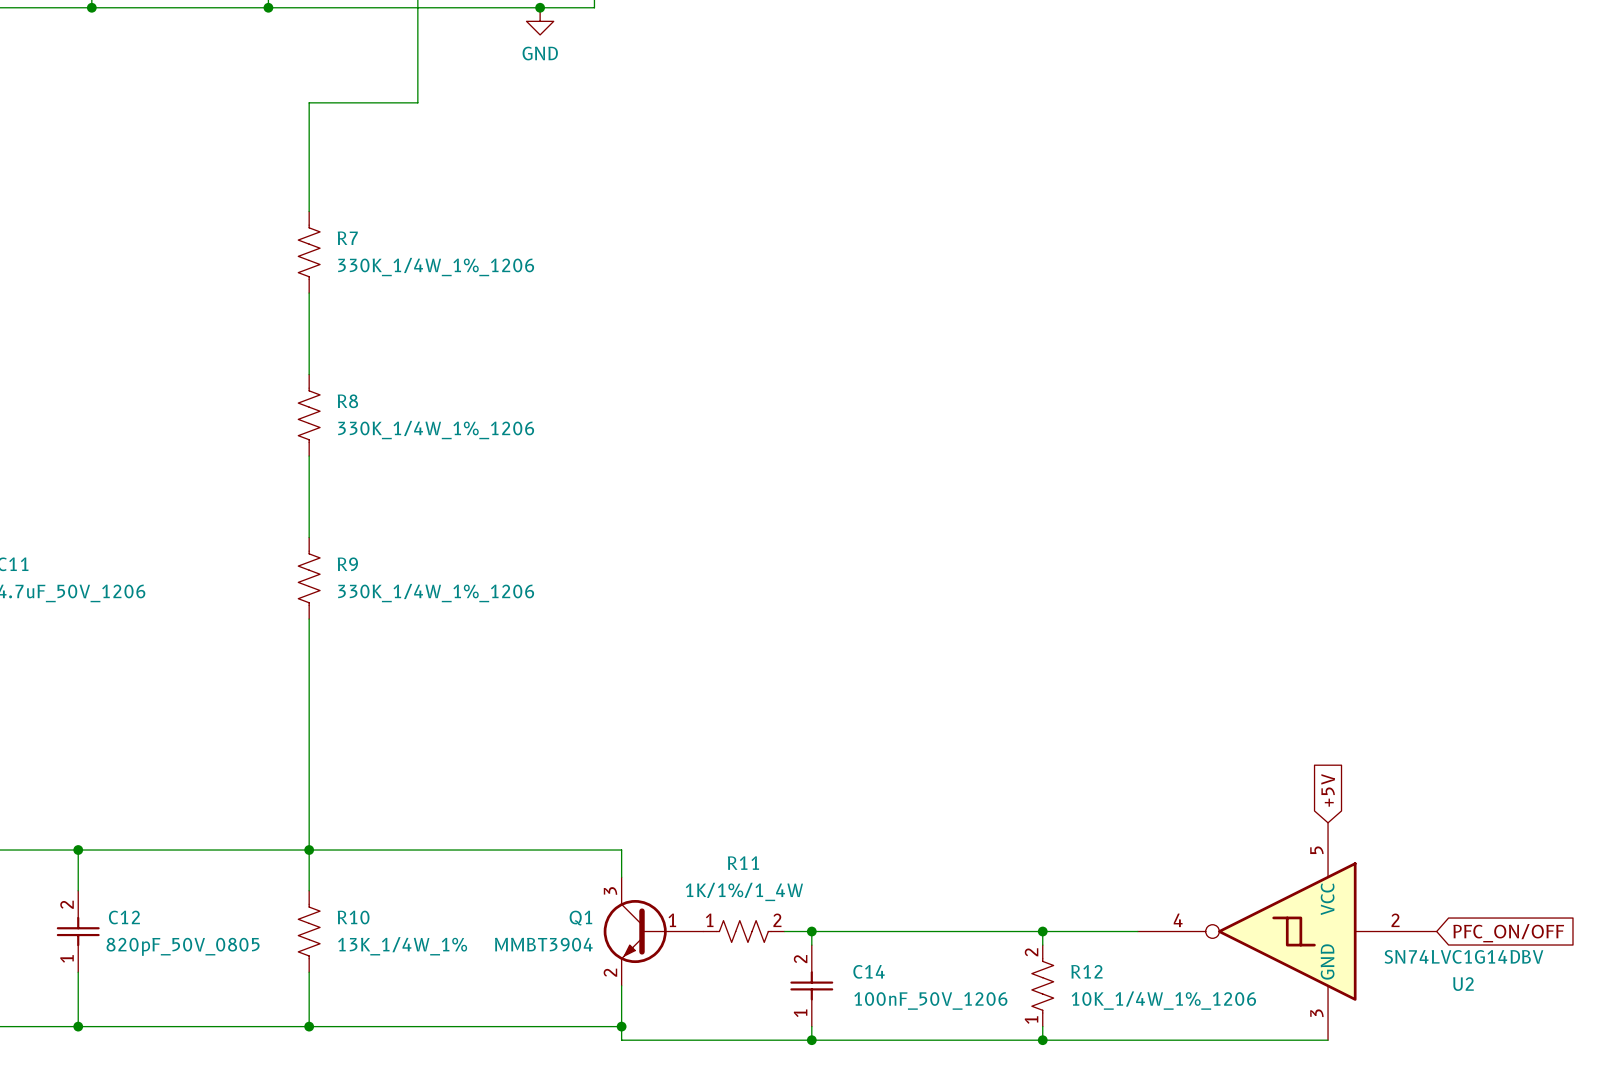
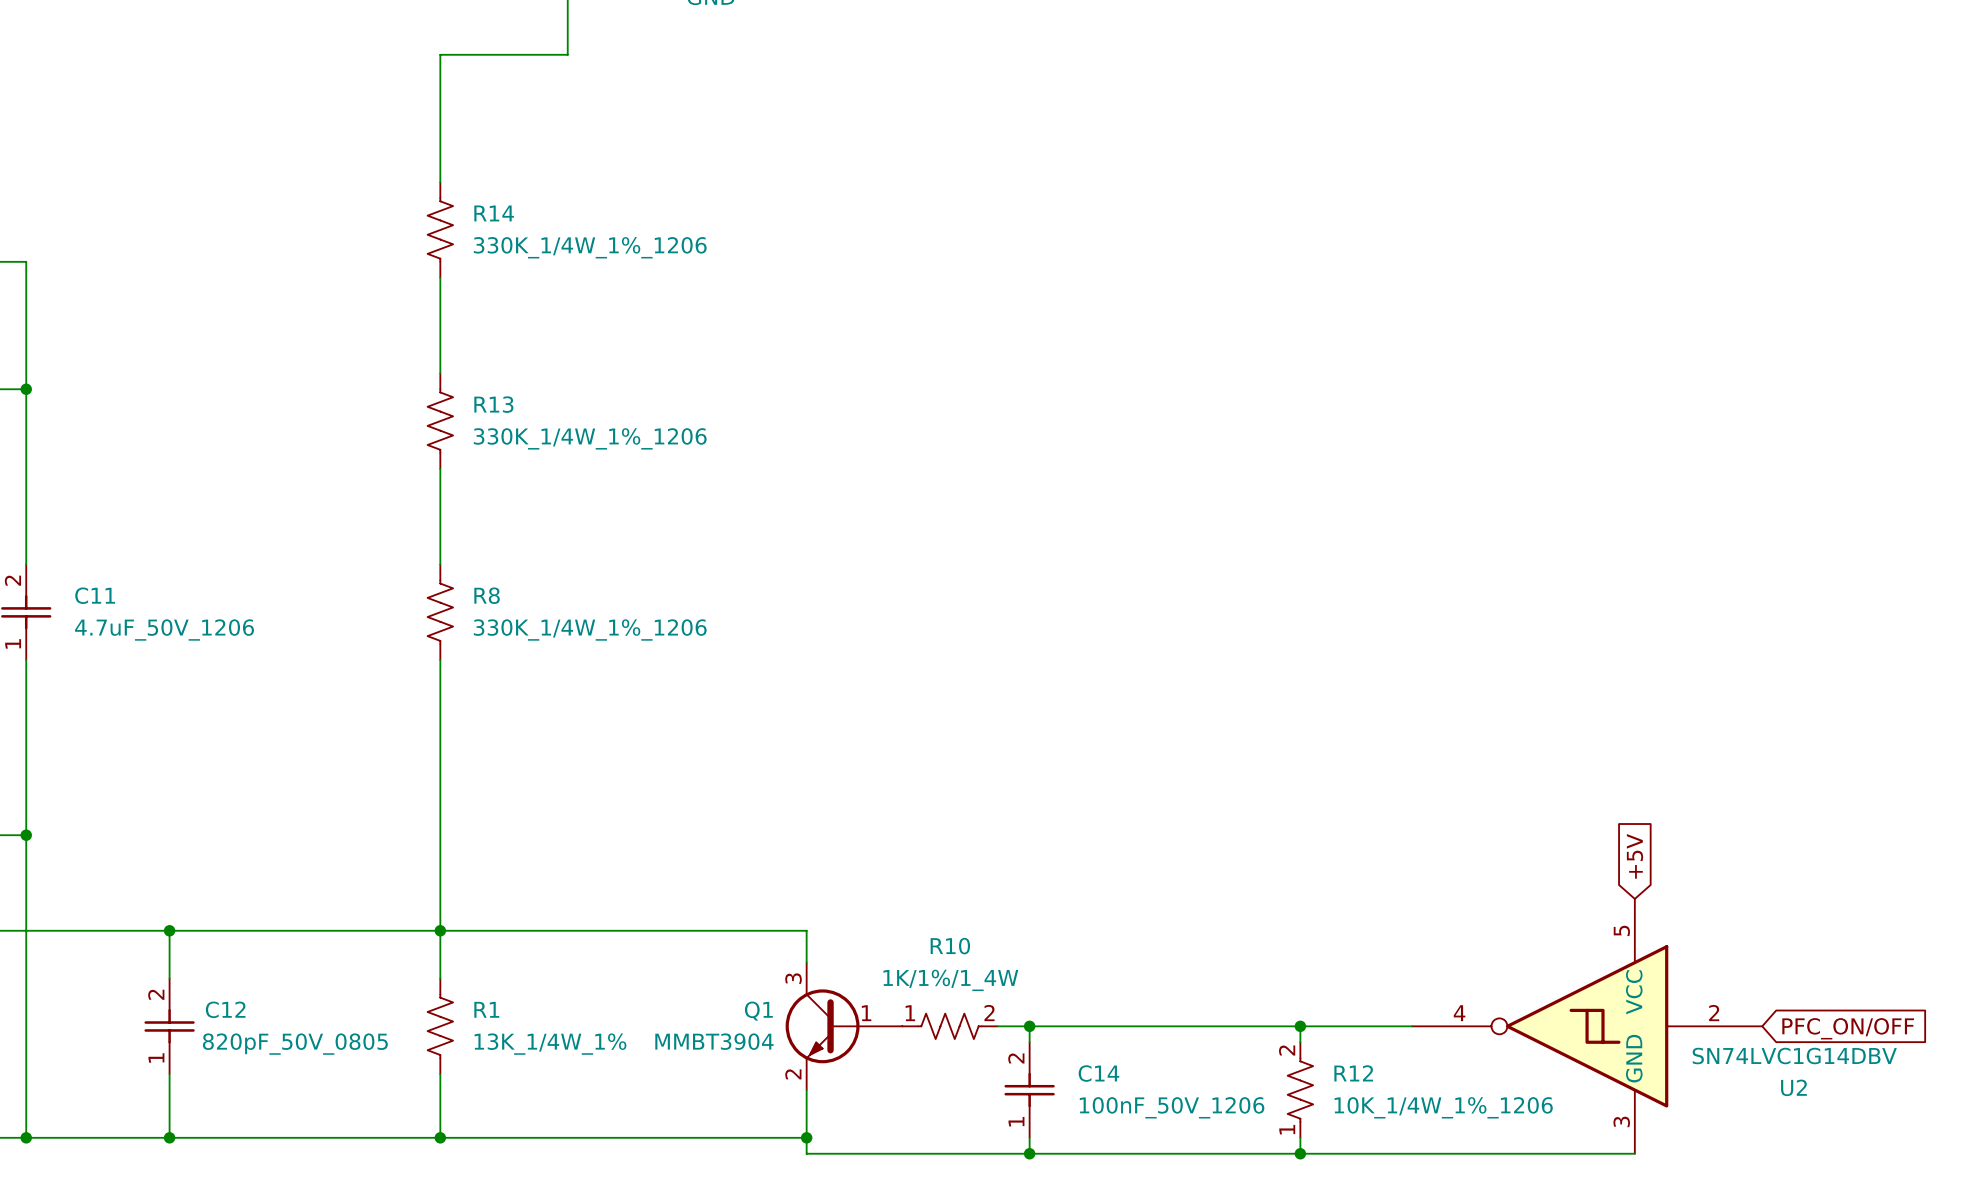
R7 name: R7 (347, 238) -> R14 (494, 213)
R8 name: R8 (347, 401) -> R13 (493, 404)
R9 name: R9 (347, 564) -> R8 (487, 595)
R11 name: R11 (743, 863) -> R10 (950, 946)
R10 name: R10 (353, 917) -> R1 (486, 1009)

